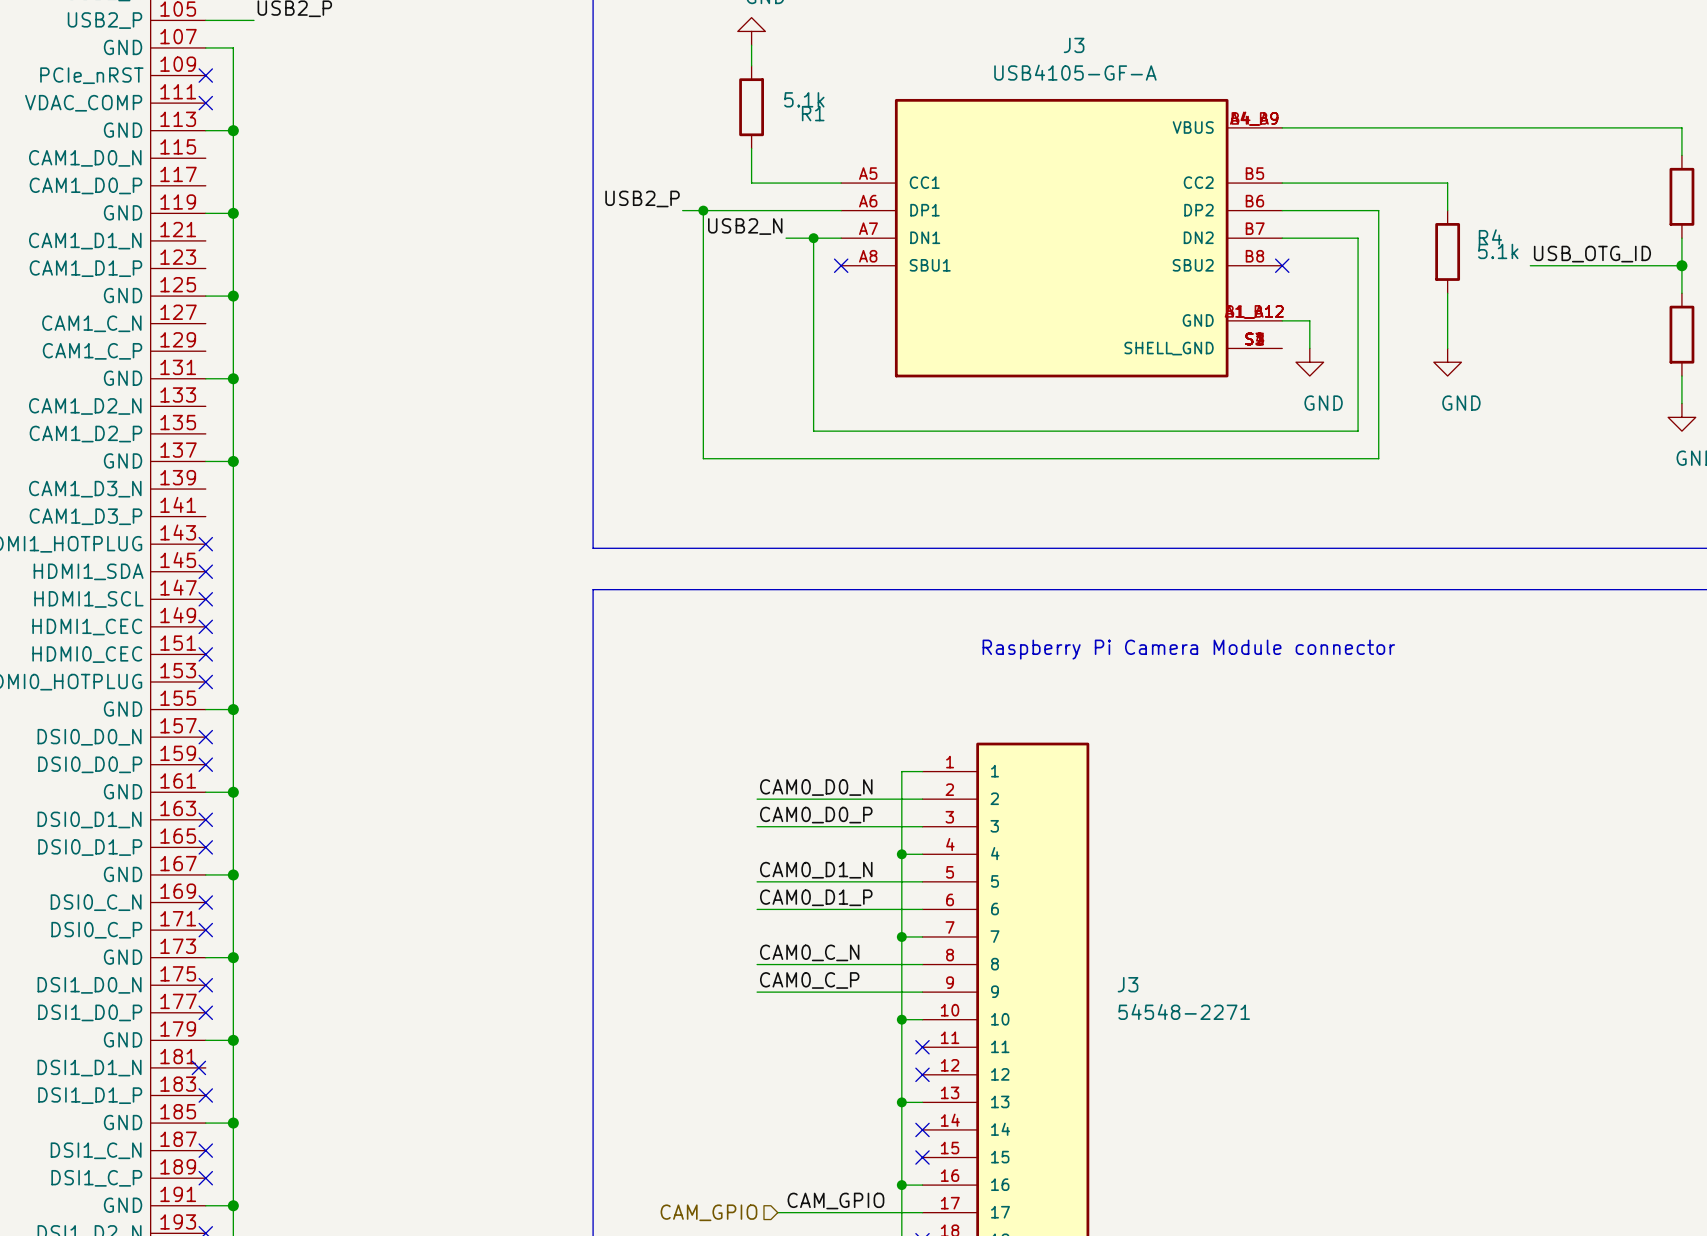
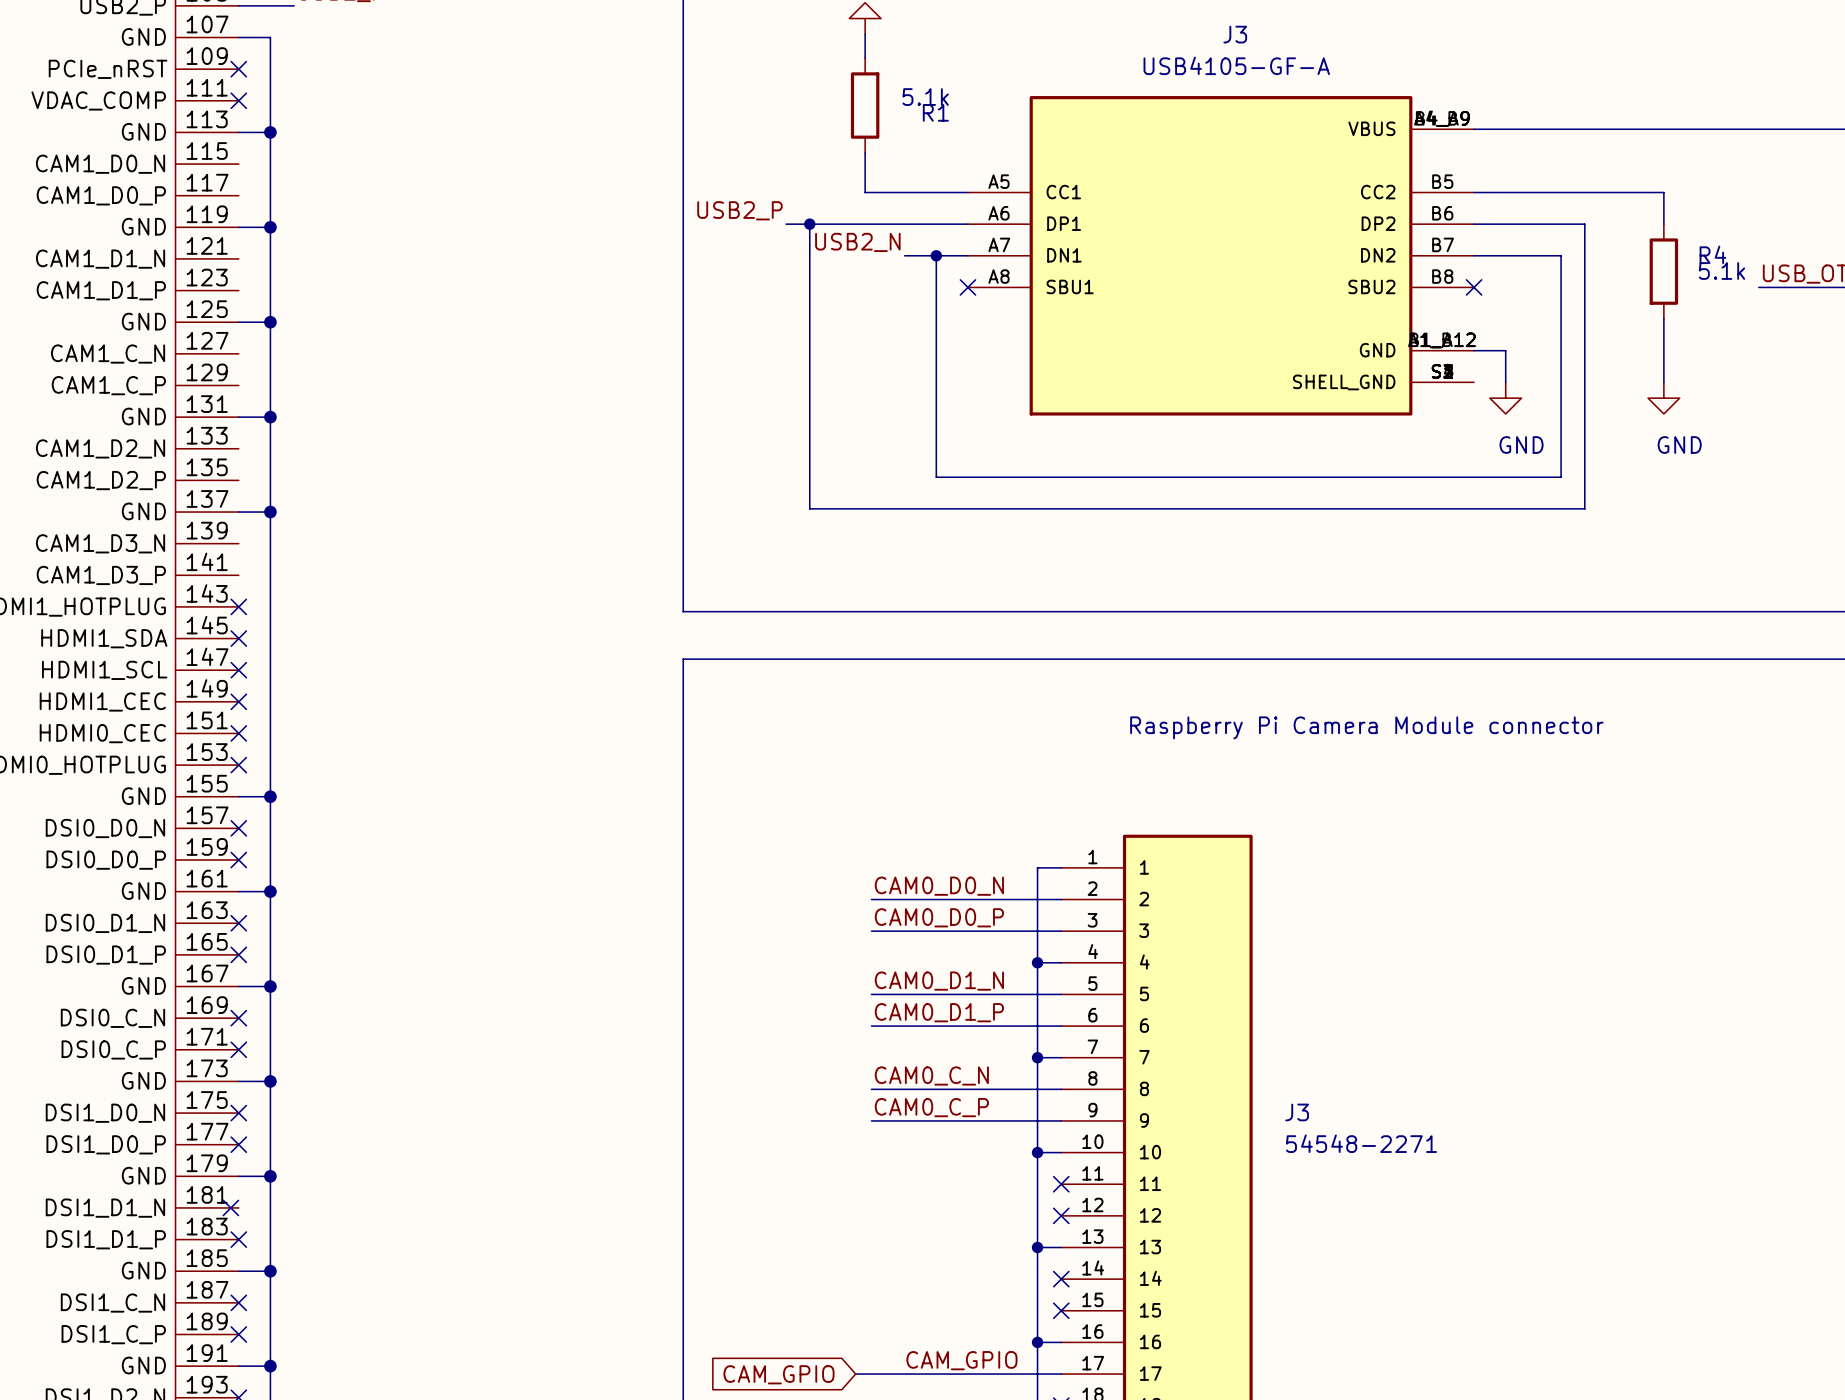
hierarchical label: CAM_GPIO (708, 1212) -> none
wire: none -> (855, 1374) (895, 1374)
global label: none -> CAM_GPIO (778, 1374)

